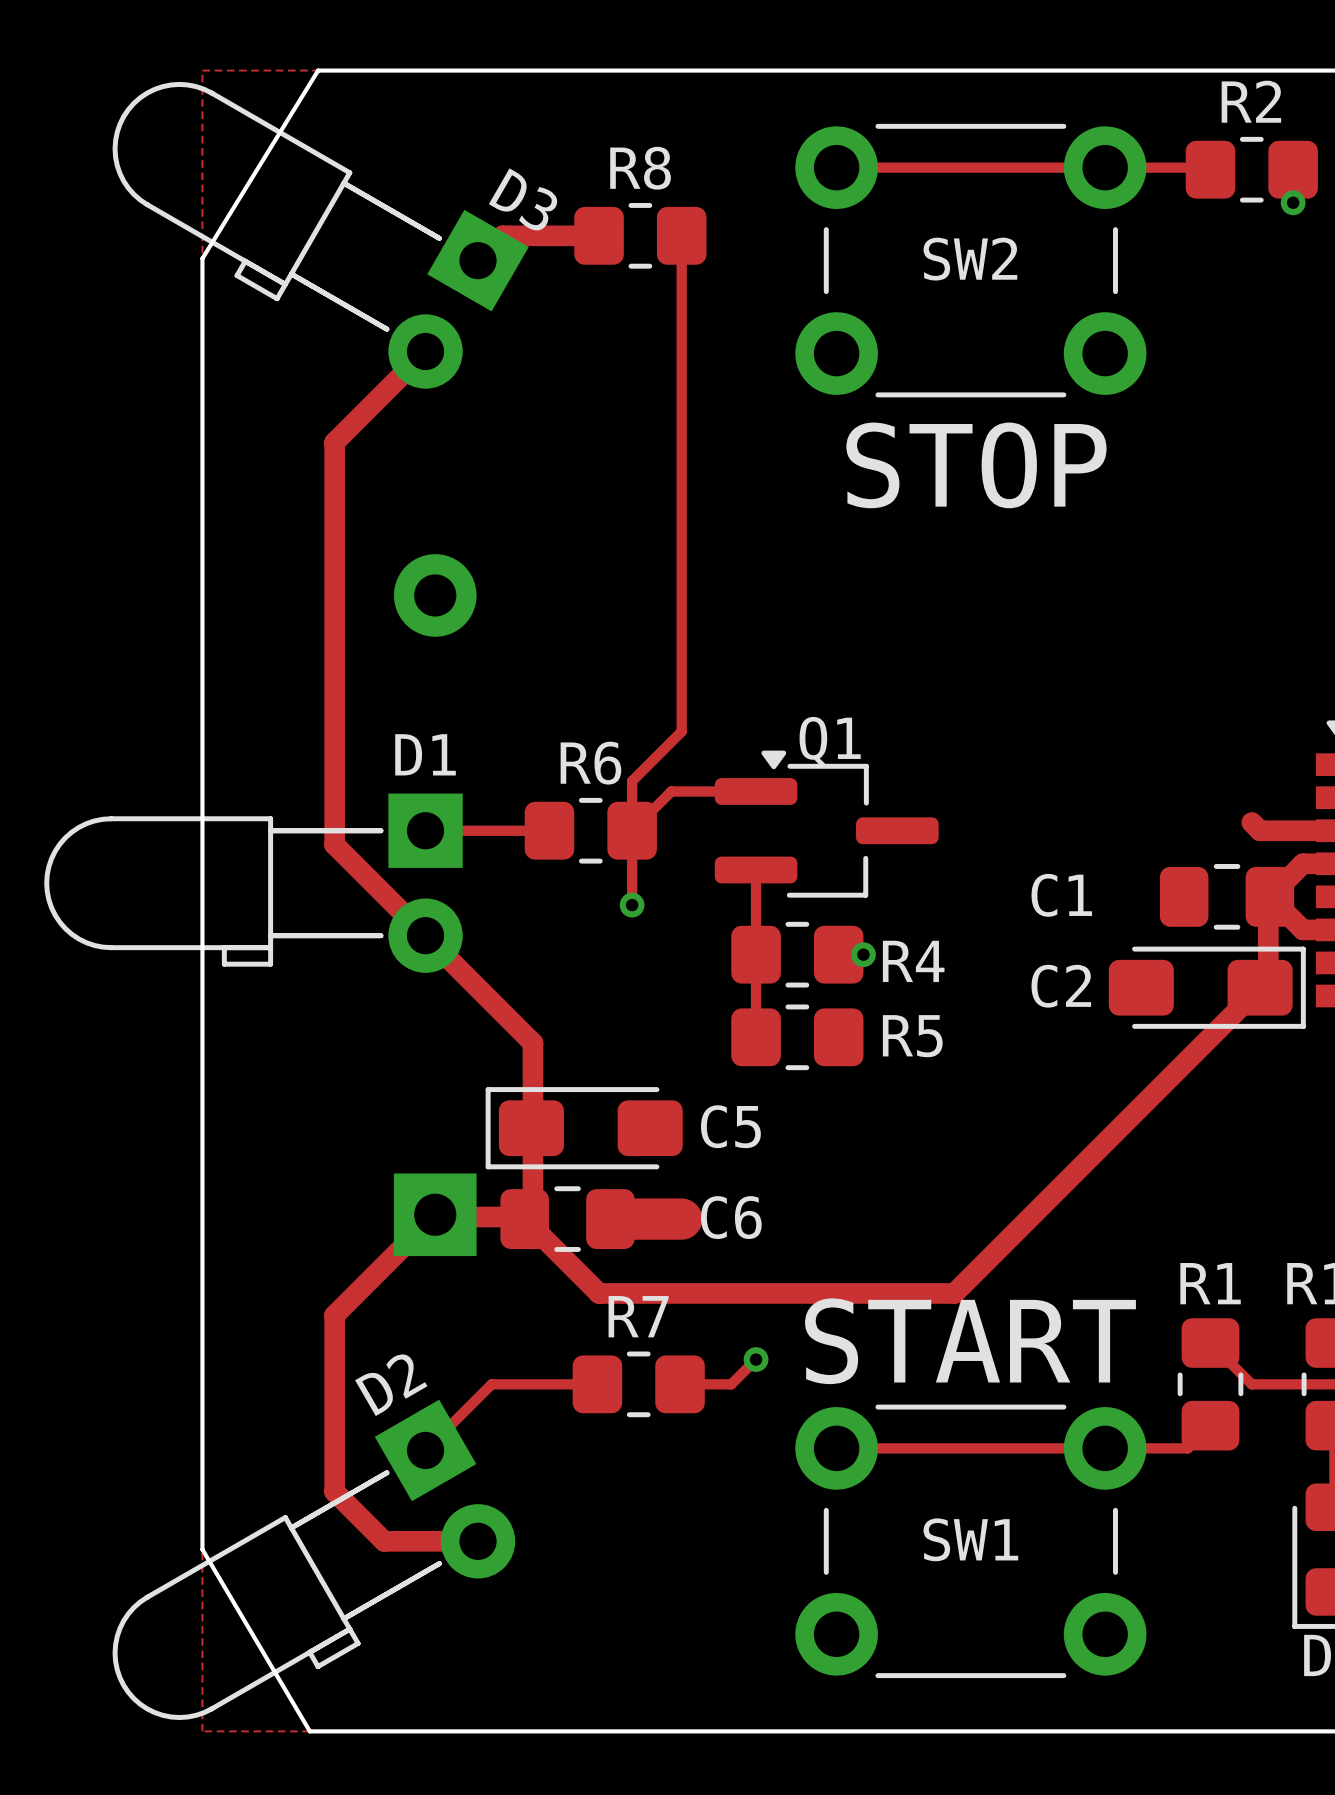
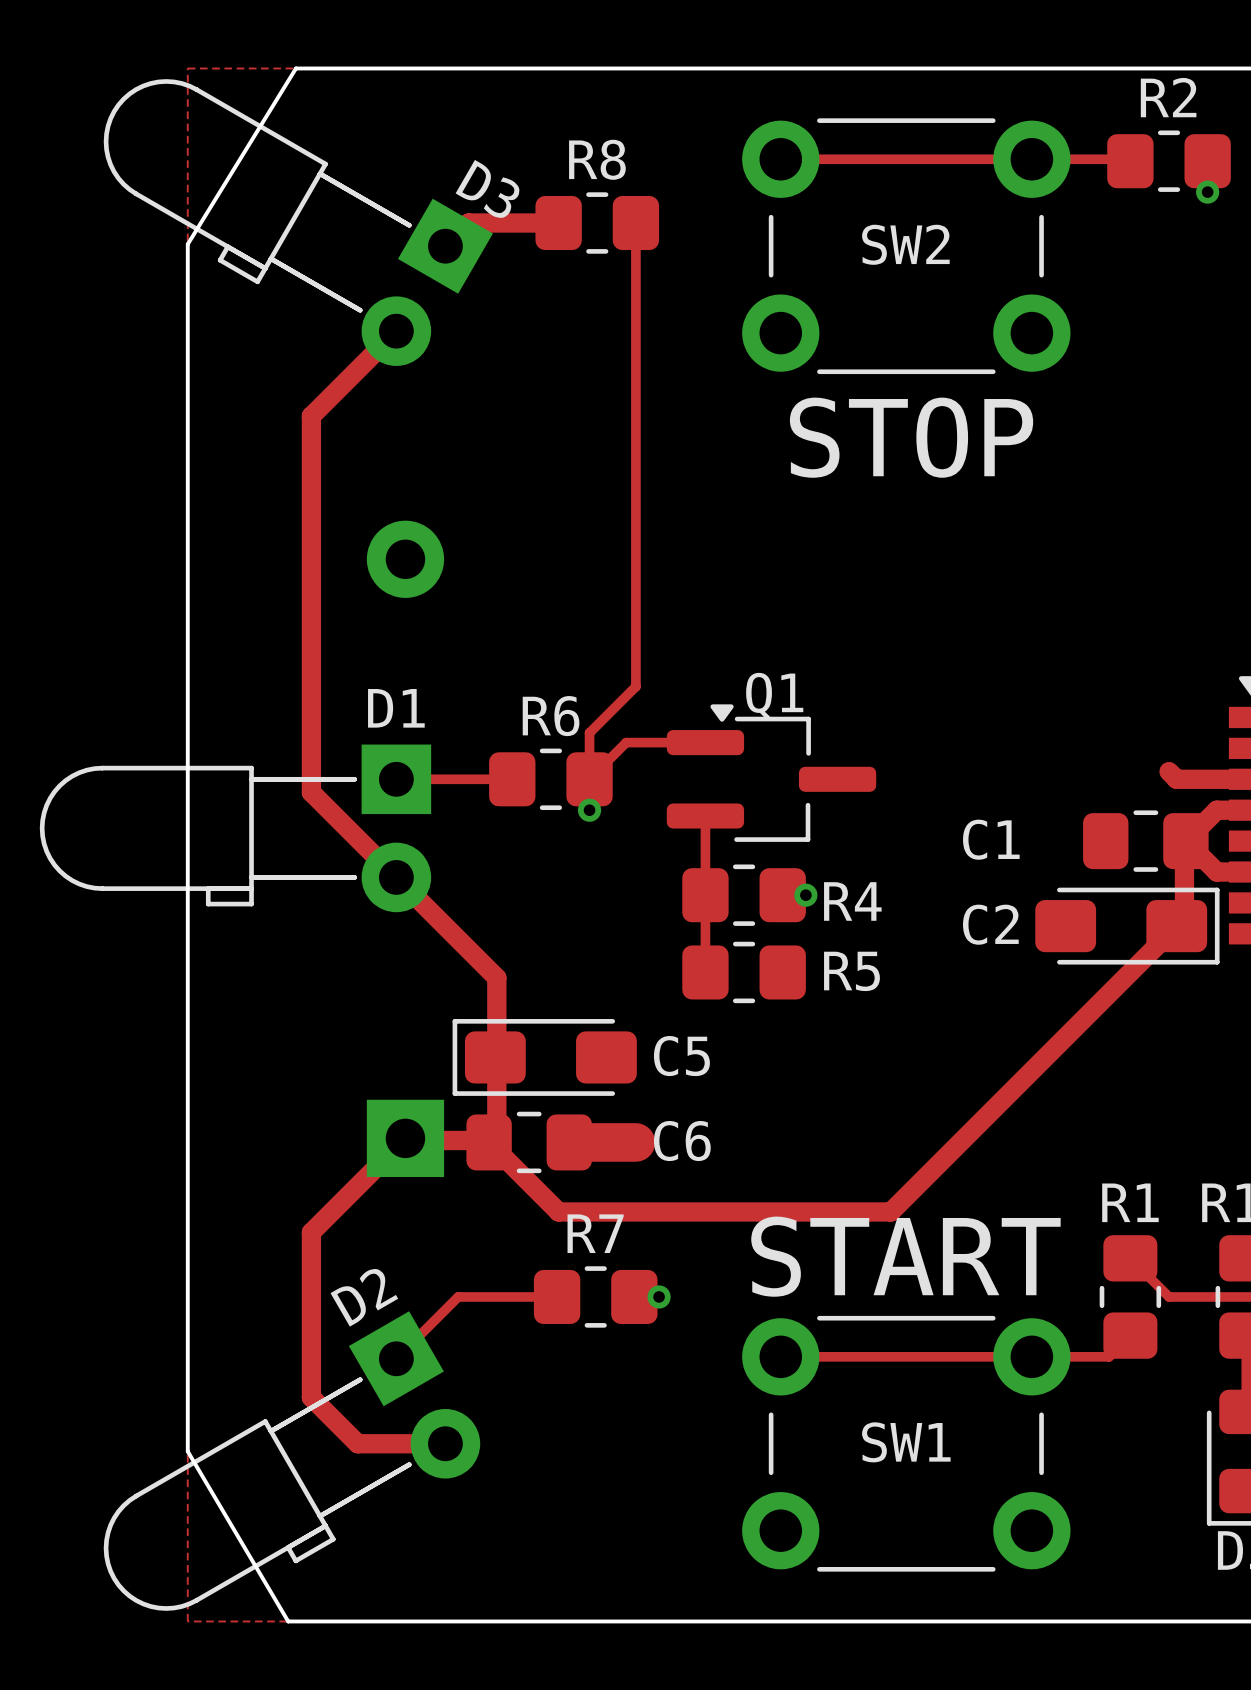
track: (632, 863) (632, 905) -> none
via position: (632, 905) -> (589, 810)
track: (756, 1359) (731, 1384) (706, 1384) -> none
via position: (756, 1359) -> (659, 1296)

